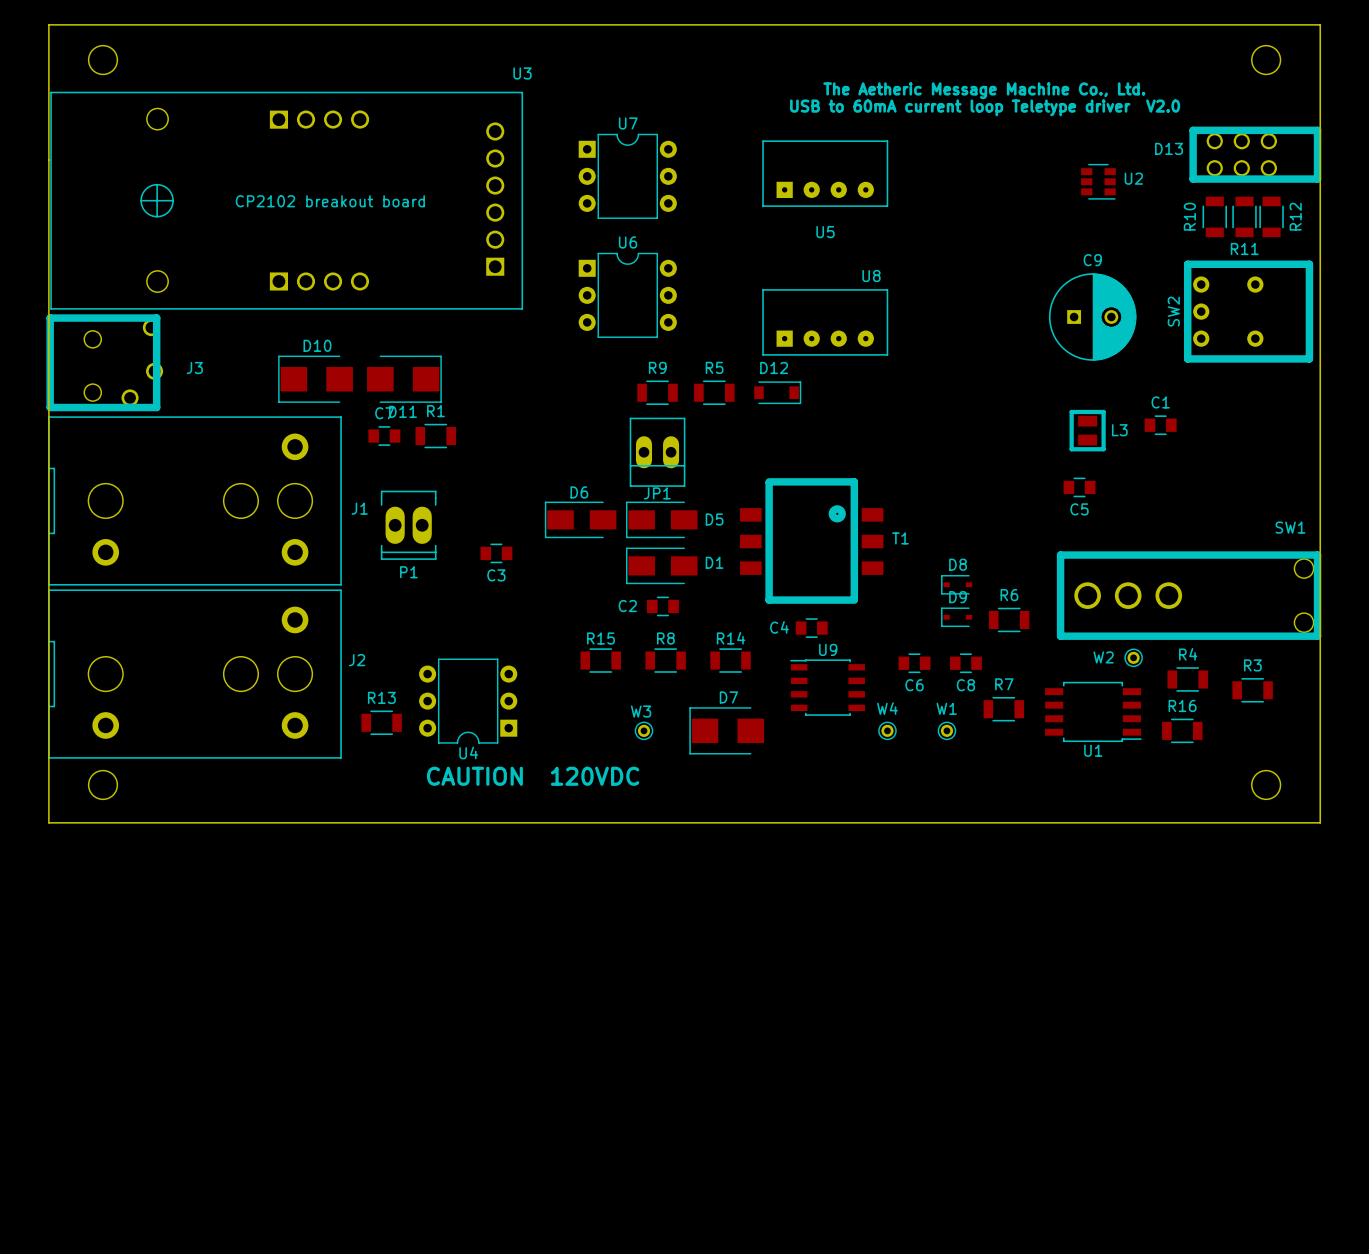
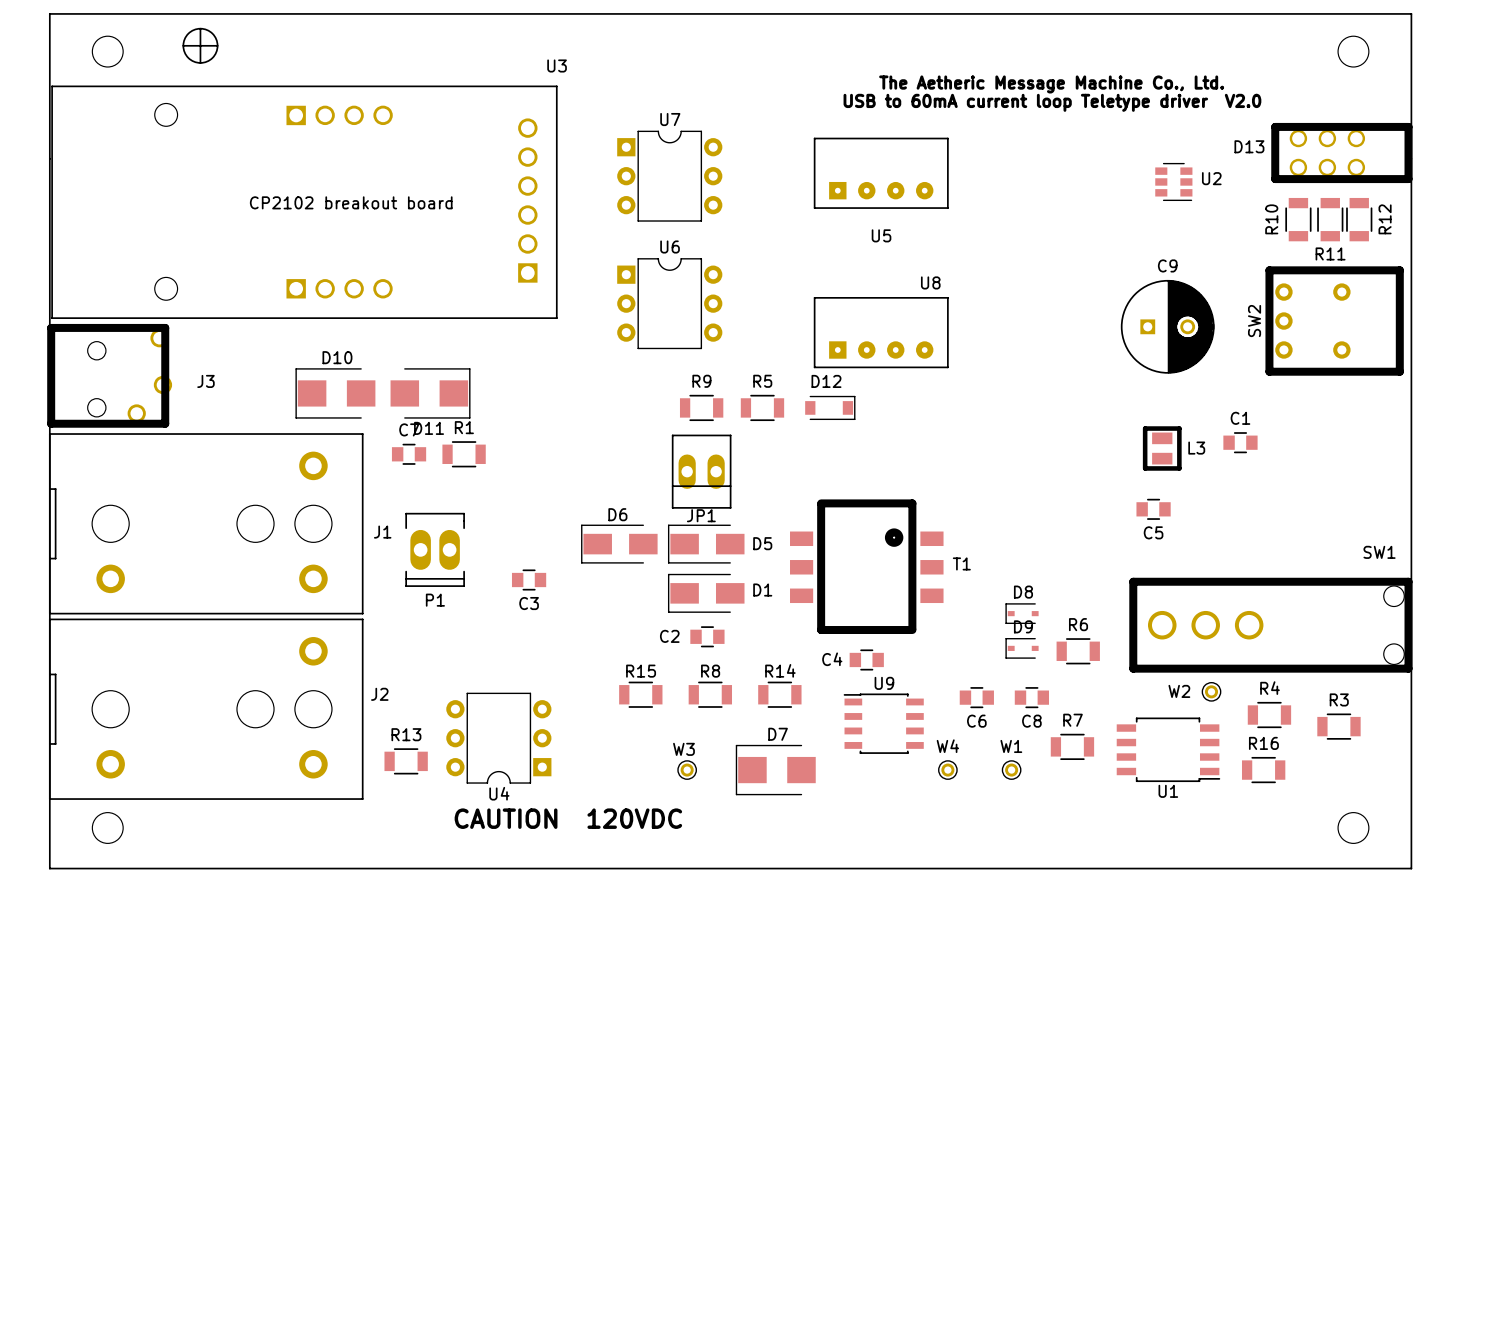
drawing position: (157, 200) -> (200, 45)

